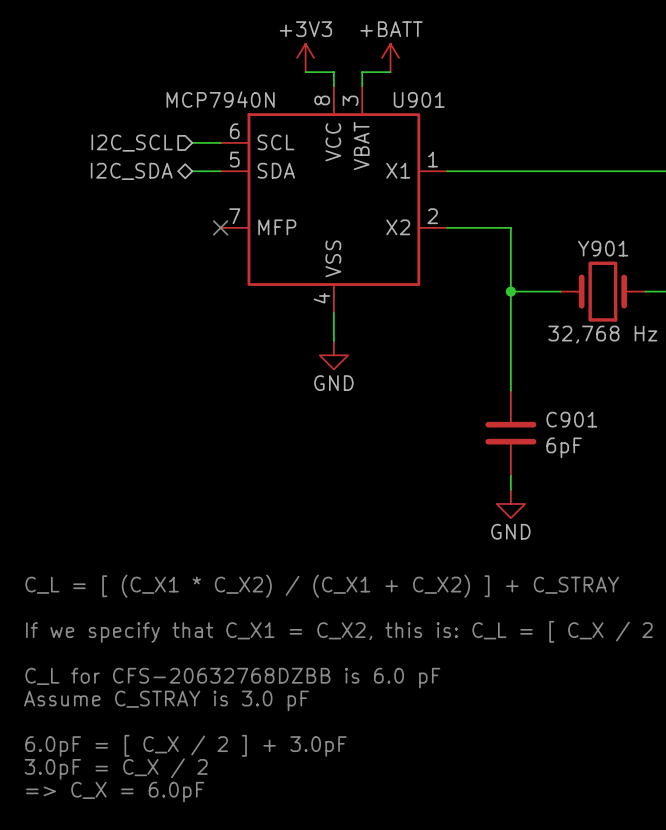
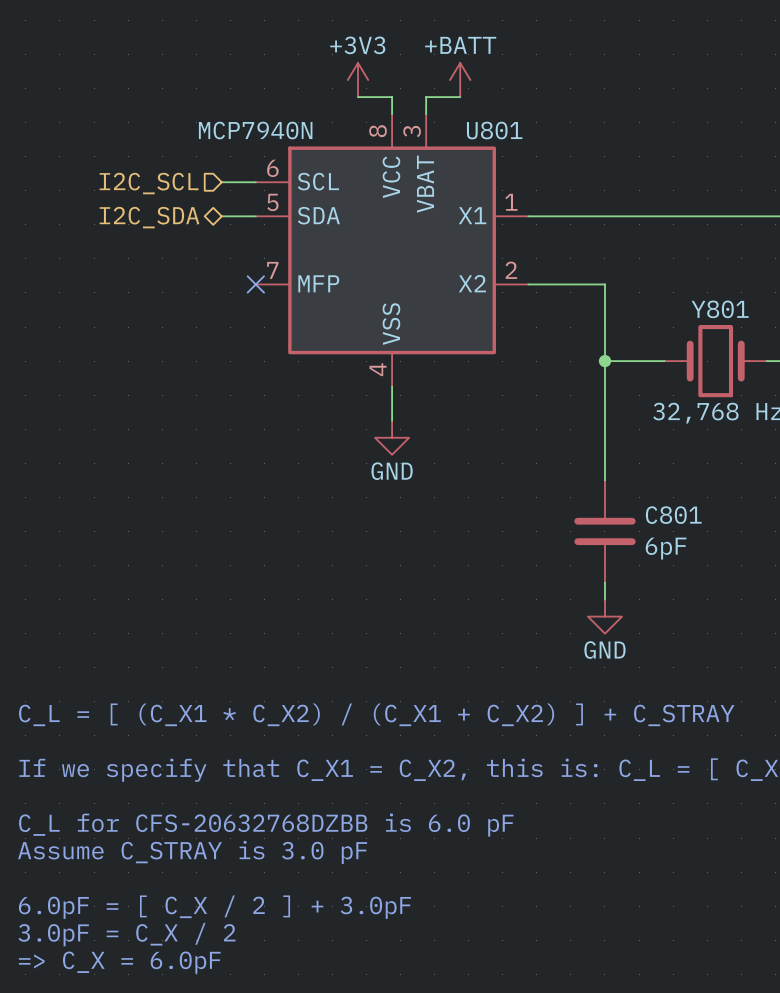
U901 name: U901 (419, 99) -> U801 (494, 130)
Y901 name: Y901 (603, 248) -> Y801 (720, 309)
C901 name: C901 (571, 419) -> C801 (673, 515)

